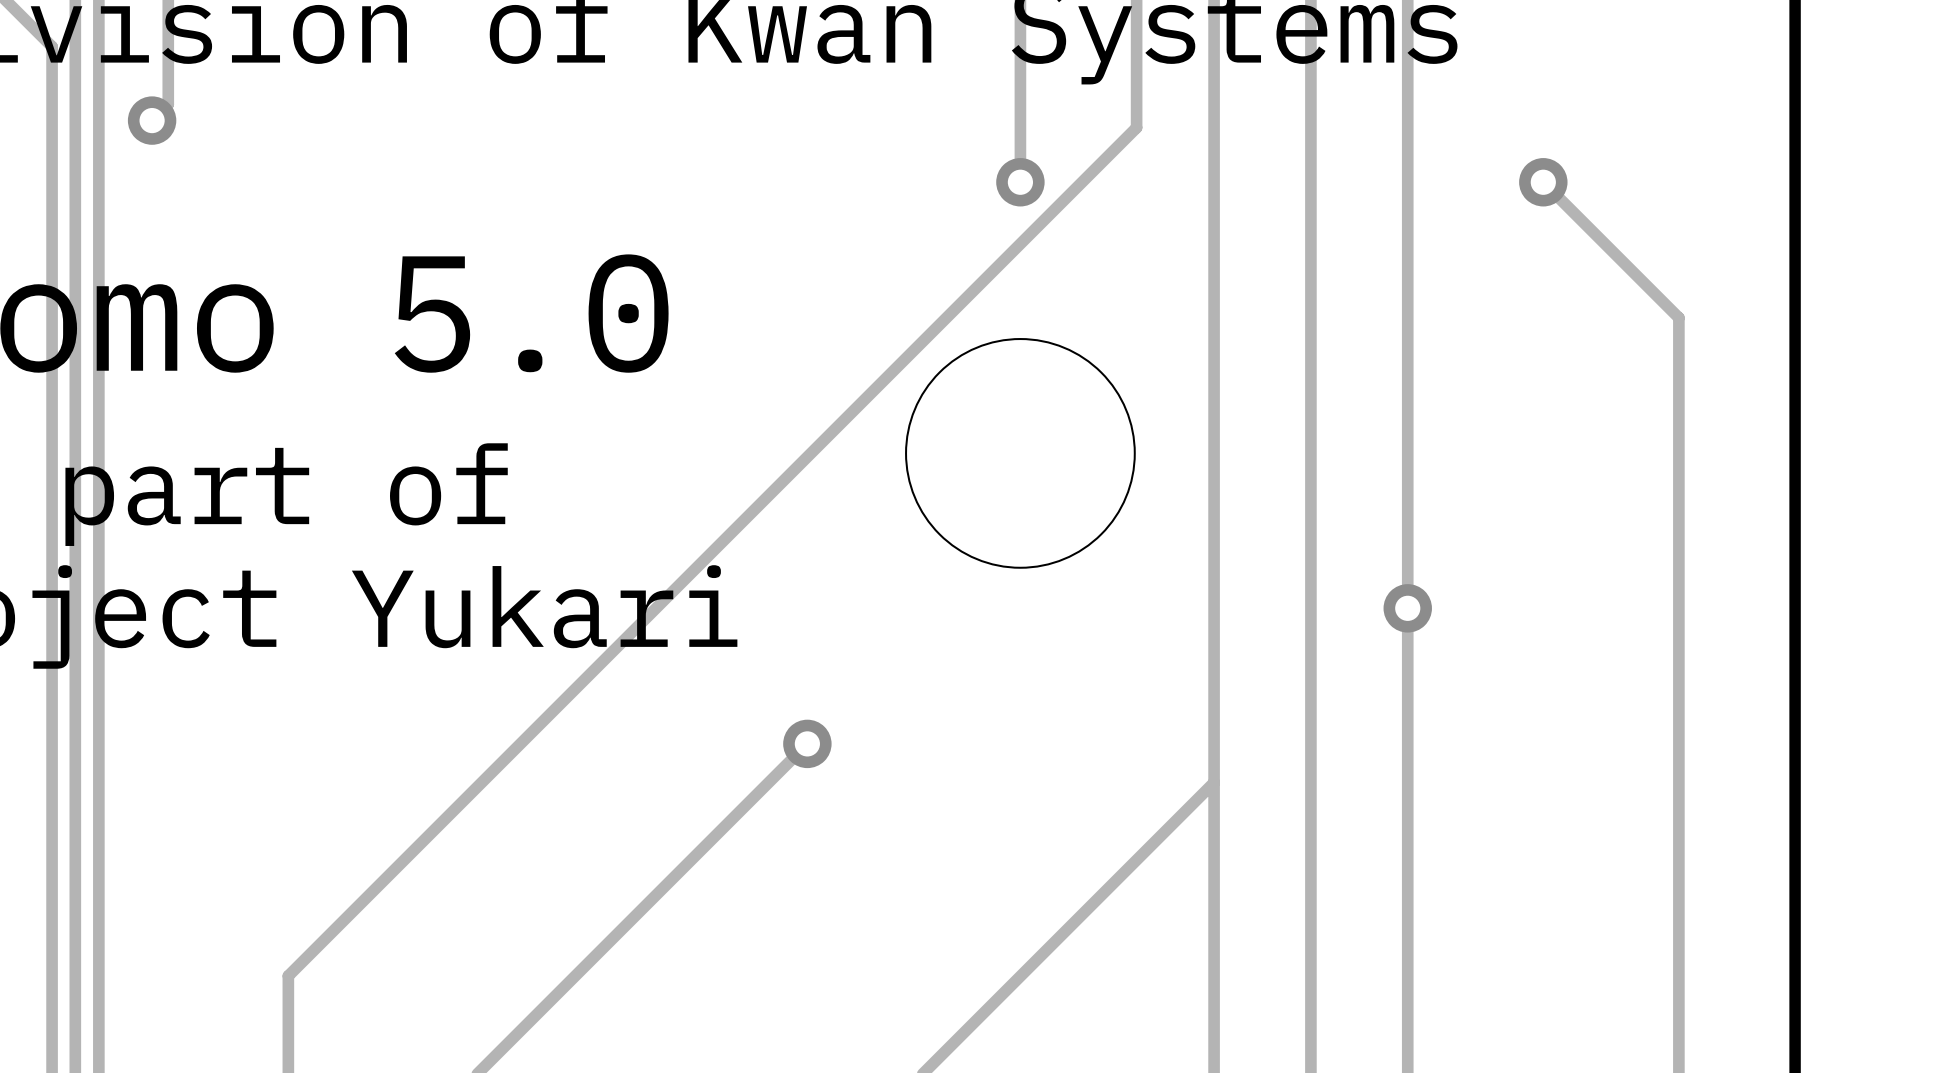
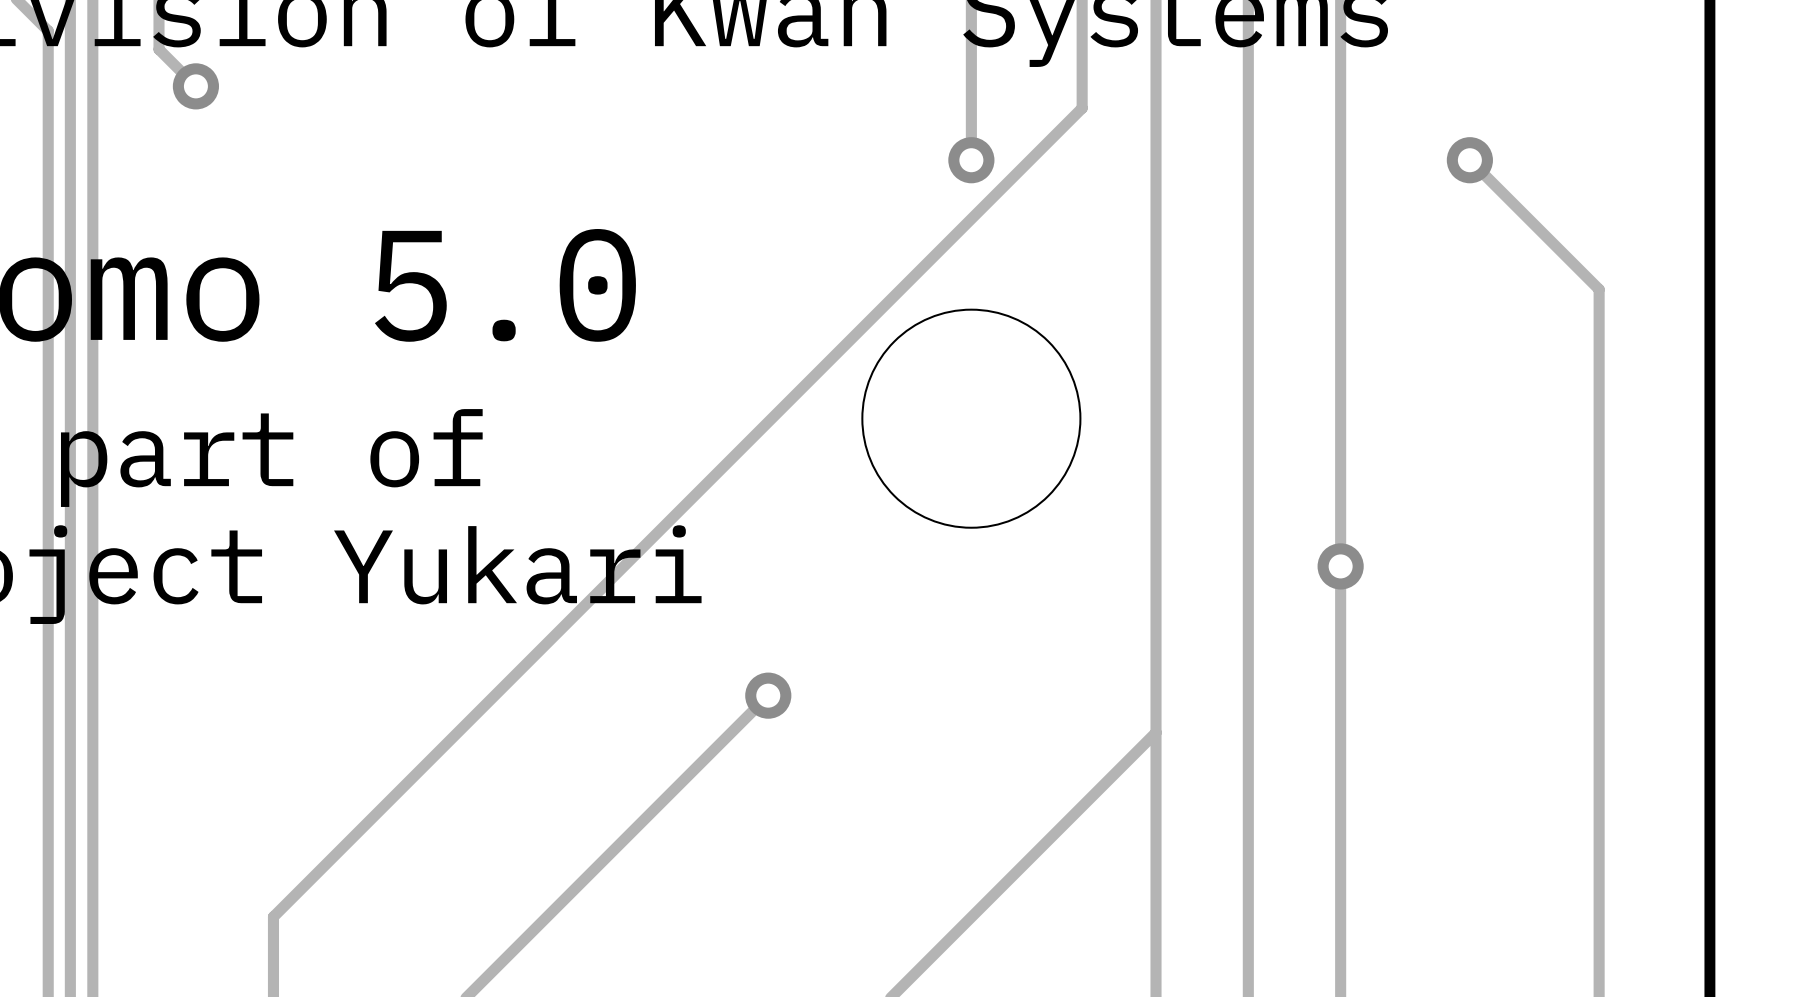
track: (168, 66) (168, 104) (152, 120) -> (159, 49) (195, 86)
via position: (152, 120) -> (195, 86)

